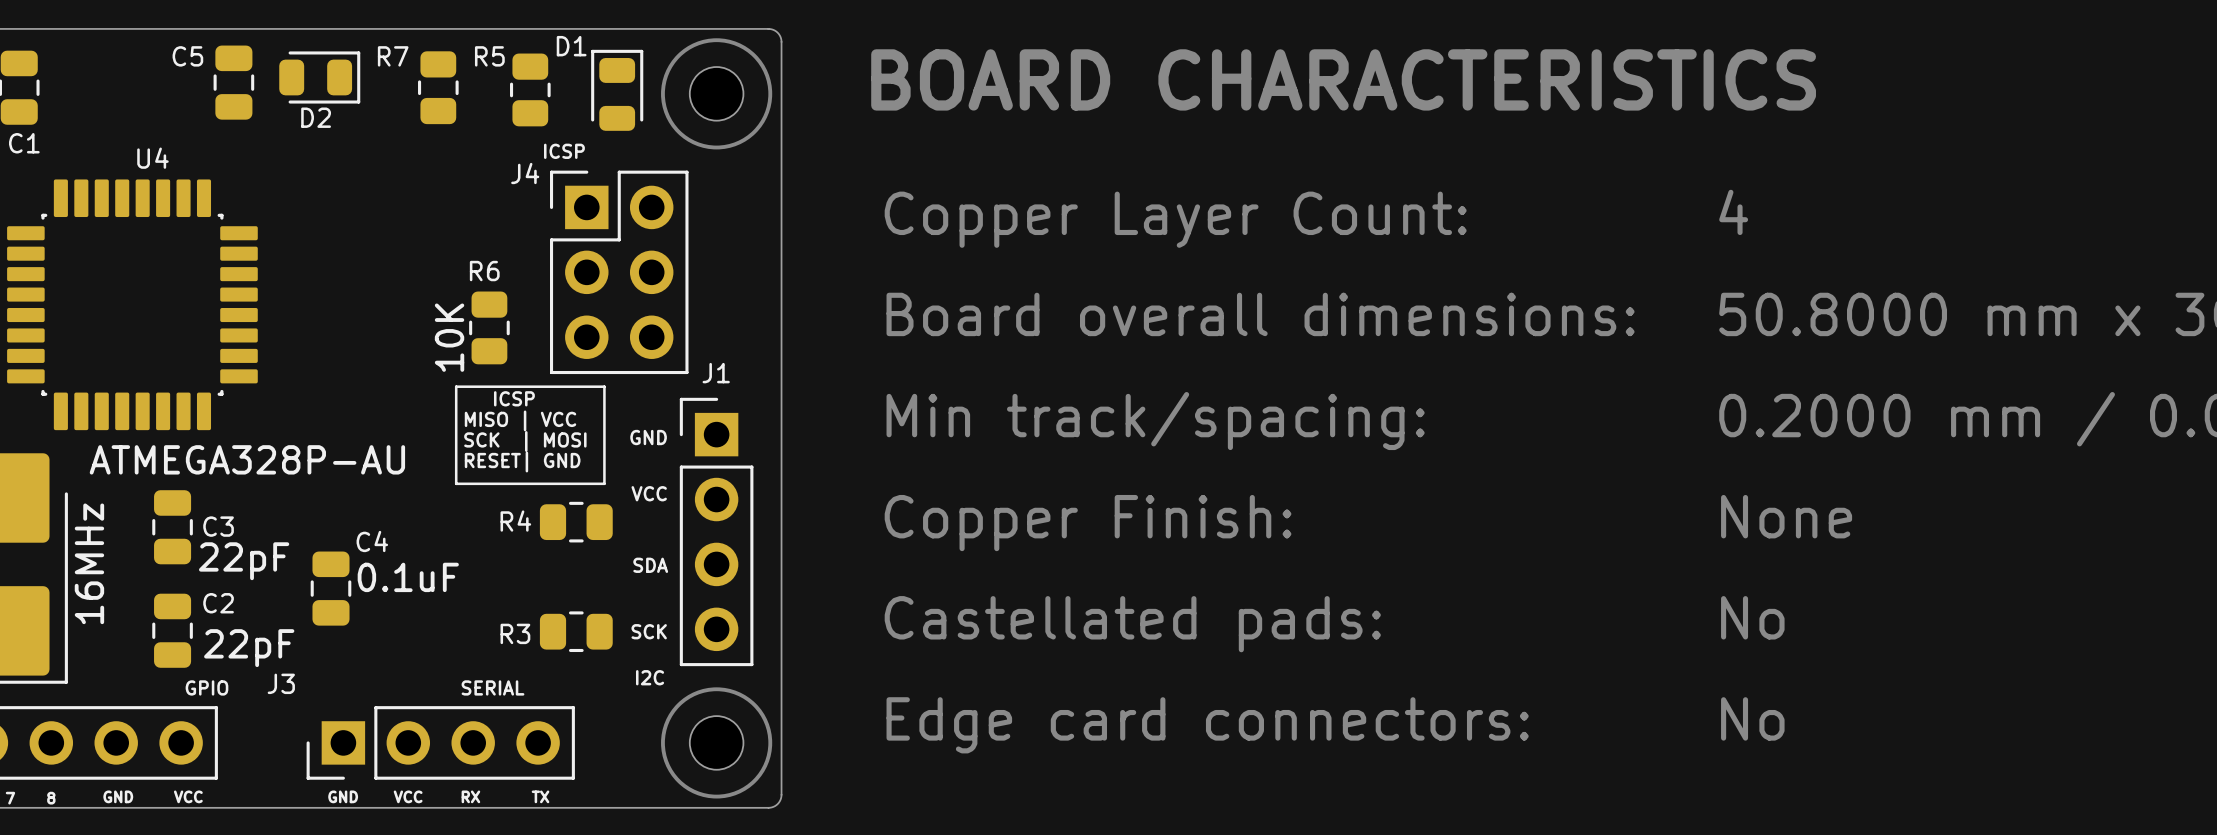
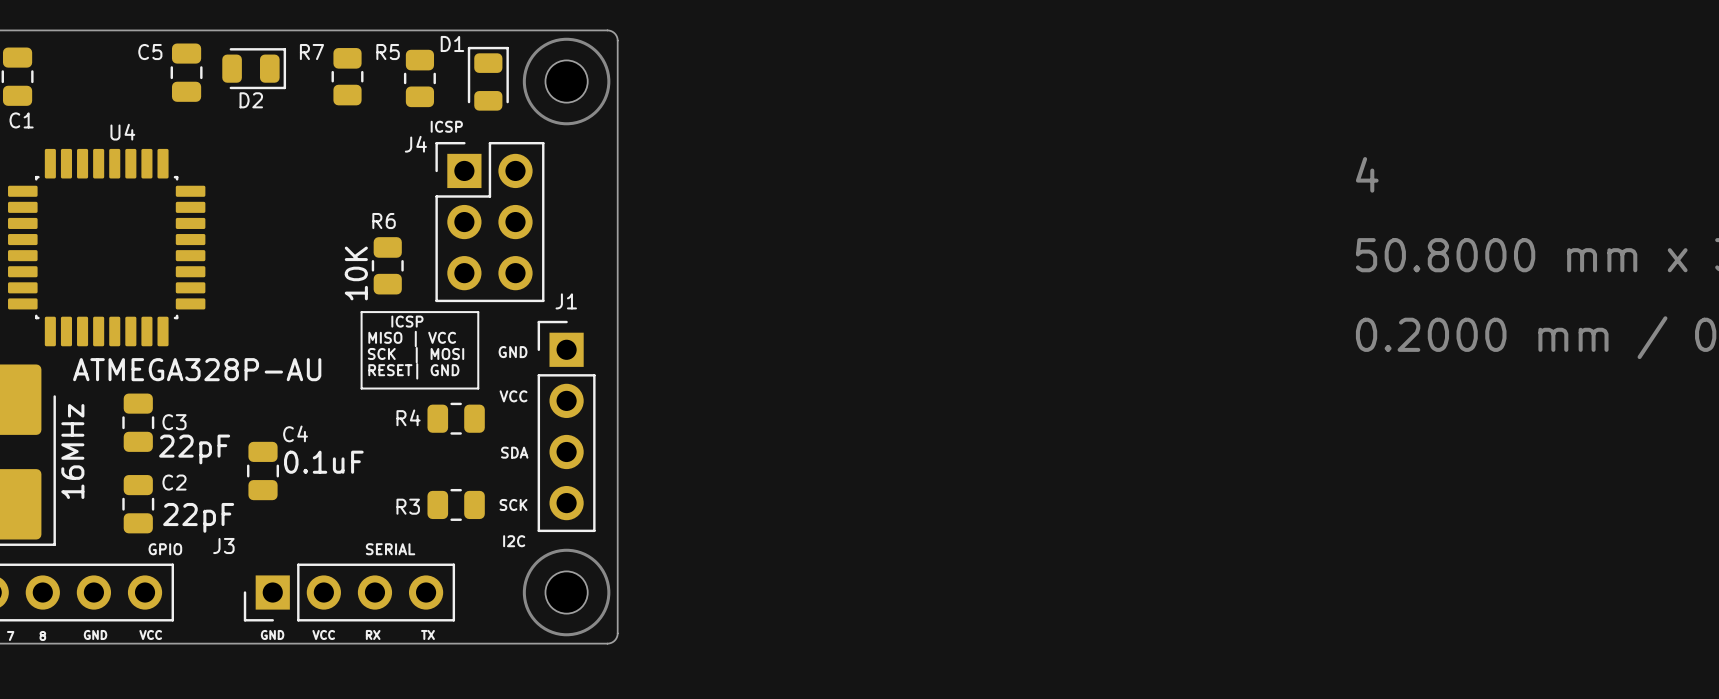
text: BOARD CHARACTERISTICS (1343, 79) -> none
text: Copper Layer Count: (1175, 219) -> none
text: Board overall dimensions: (1260, 314) -> none
text: Min track/spacing: (1155, 421) -> none
text: None (1786, 516) -> none
text: Copper Finish: (1088, 523) -> none
text: No (1752, 617) -> none
text: Castellated pads: (1132, 624) -> none
text: No (1752, 718) -> none
text: Edge card connectors: (1207, 725) -> none

